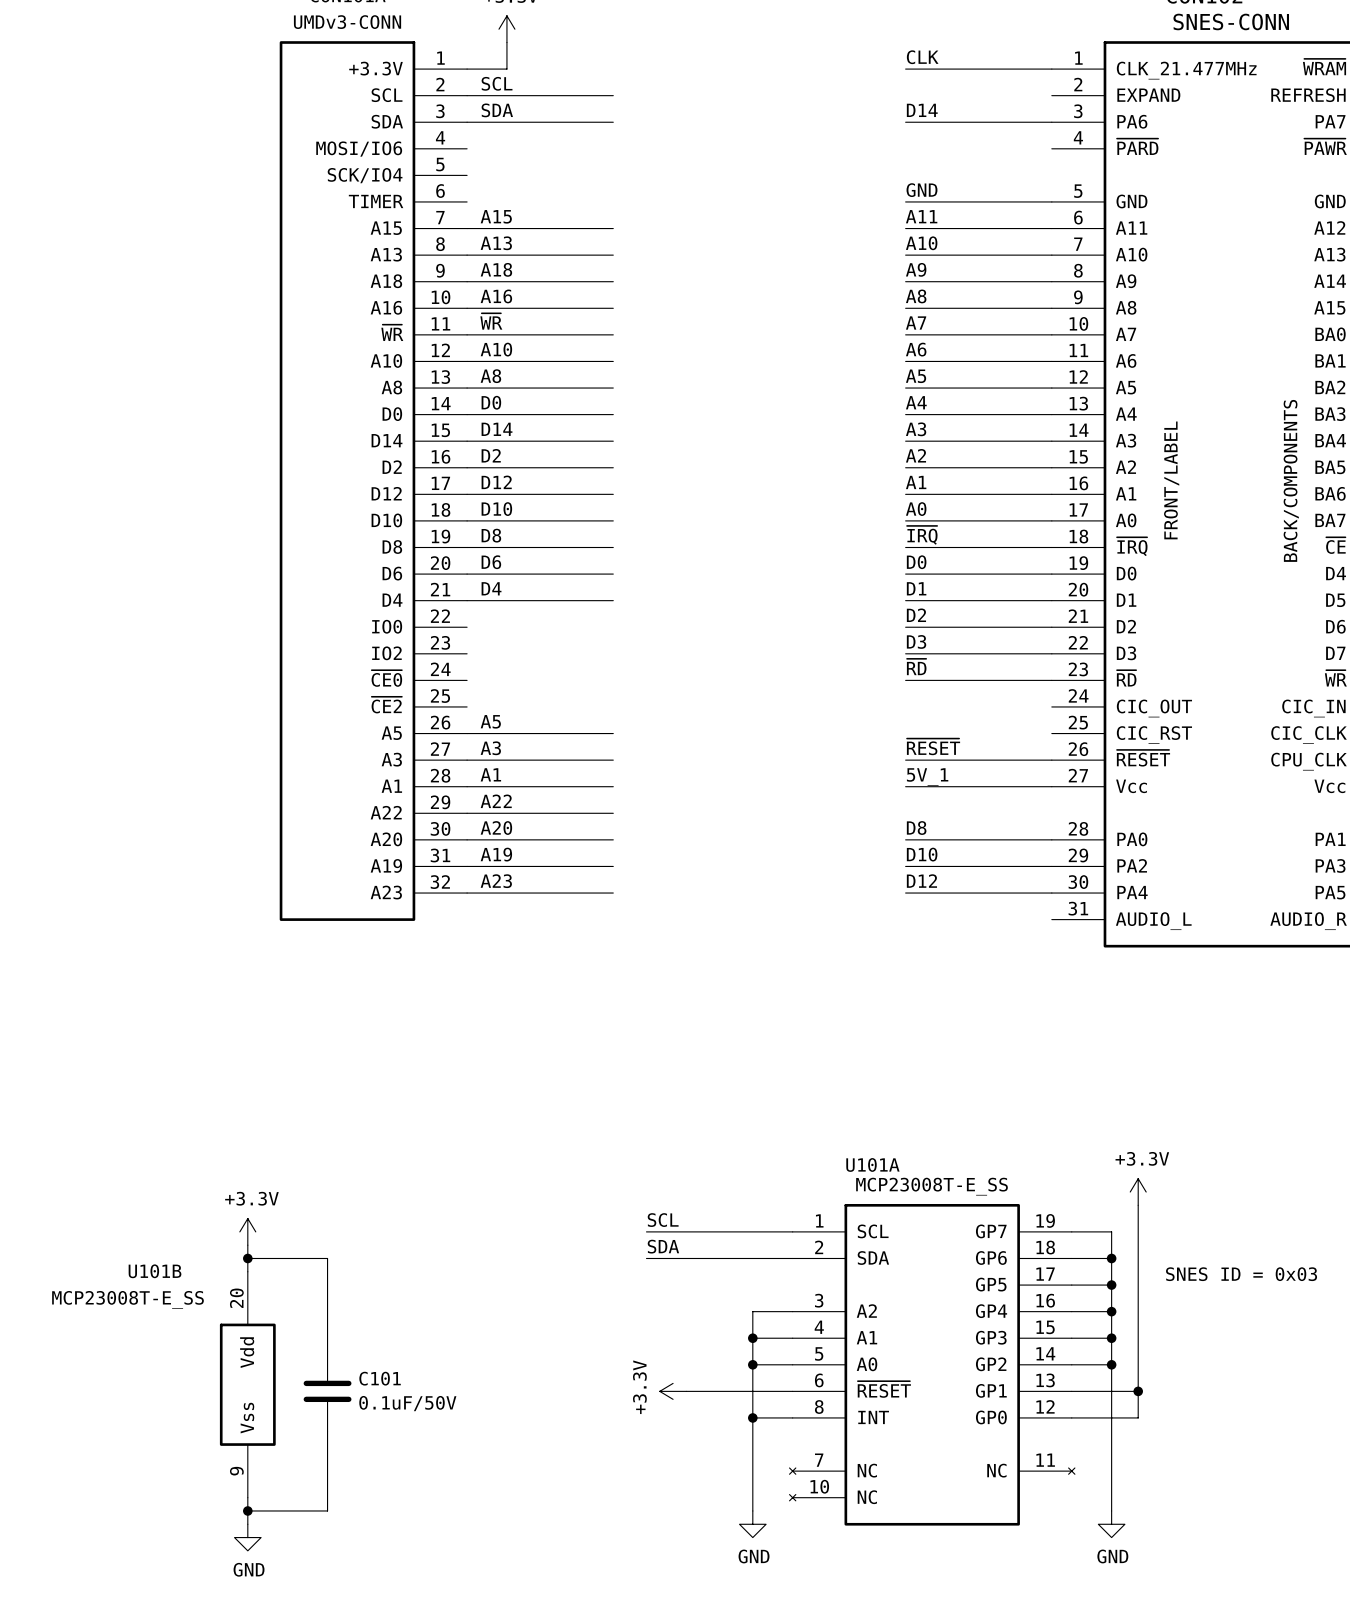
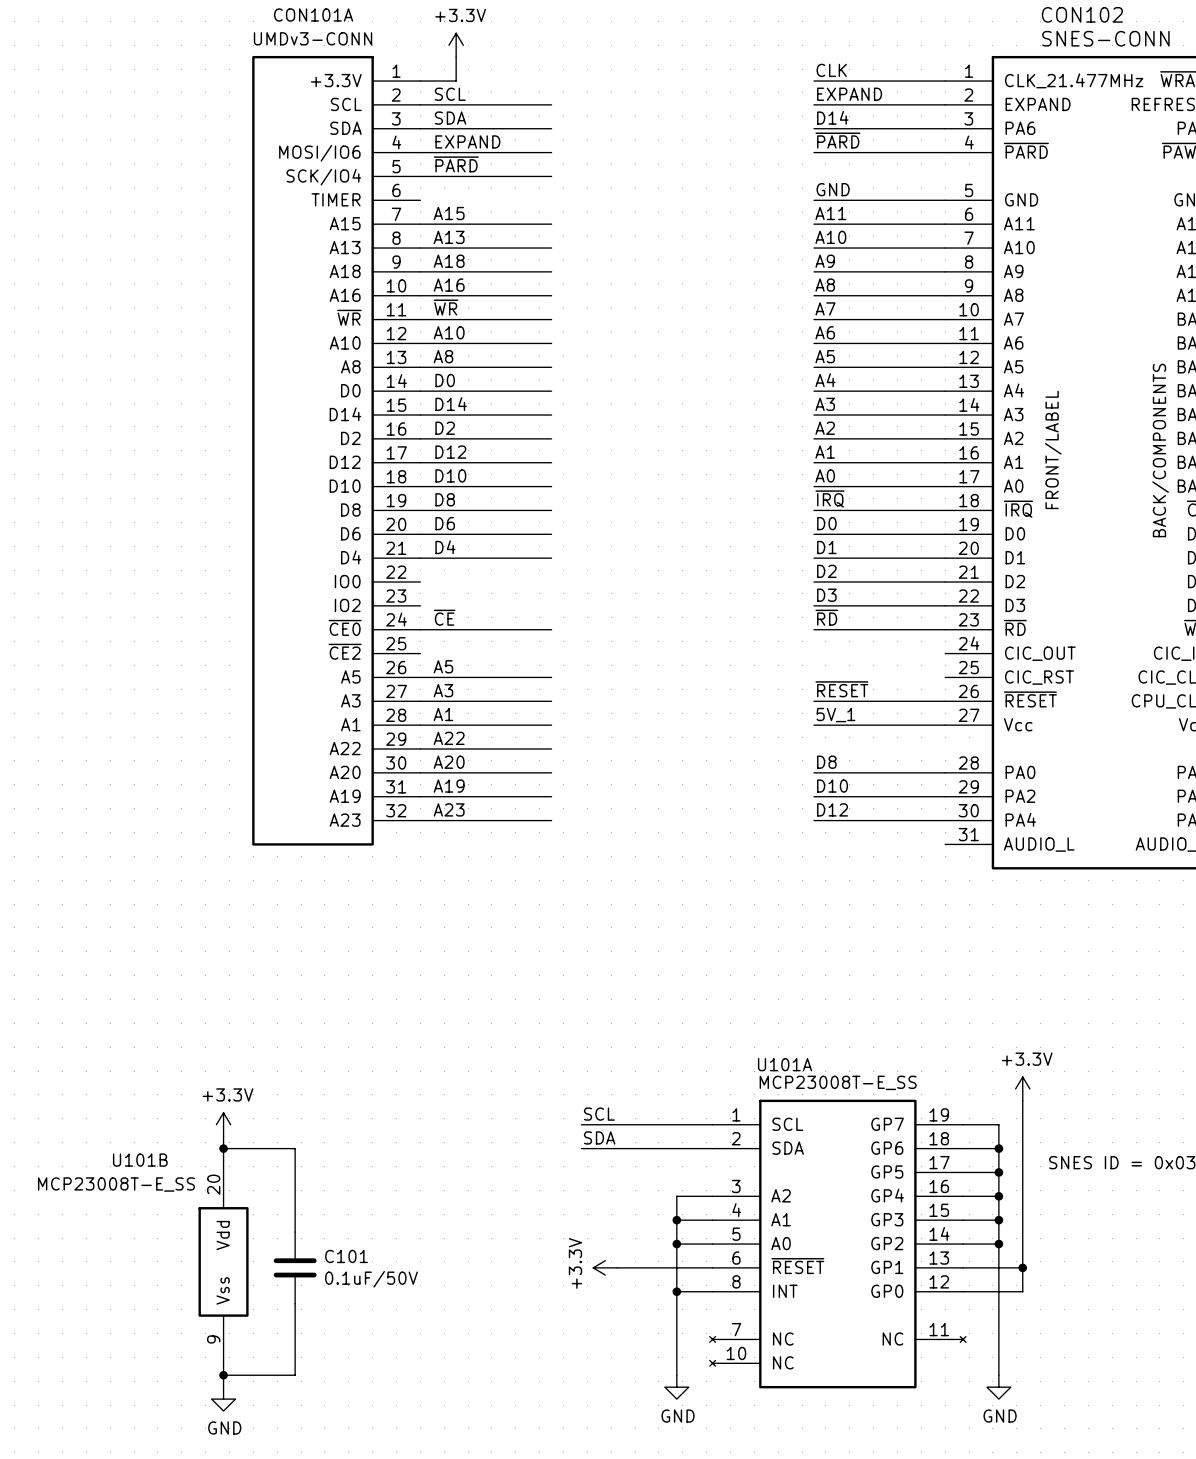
label: none -> EXPAND (849, 94)
wire: none -> (814, 104) (945, 104)
label: none -> ~{PARD} (837, 140)
label: none -> EXPAND (467, 141)
wire: none -> (420, 152) (551, 152)
wire: none -> (814, 152) (945, 152)
label: none -> ~{PARD} (456, 164)
wire: none -> (420, 176) (551, 176)
label: none -> ~{CE} (444, 617)
wire: none -> (420, 629) (551, 629)

